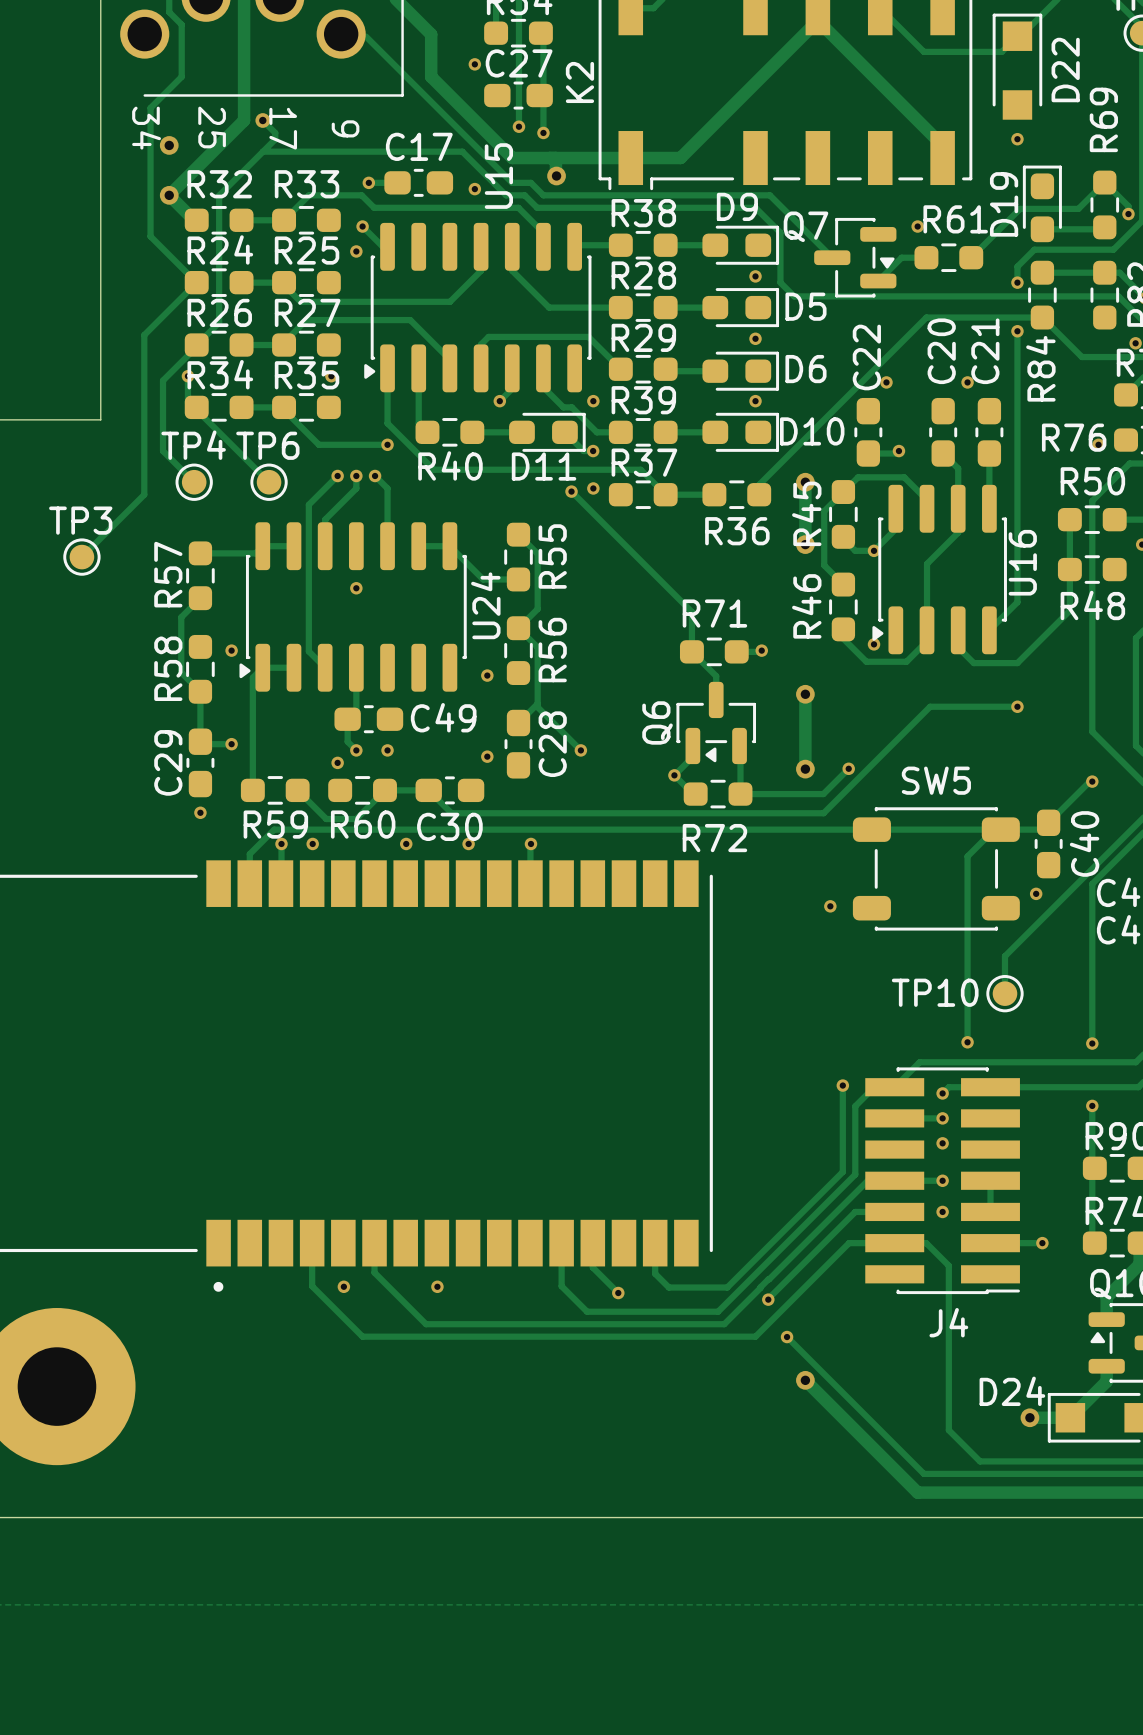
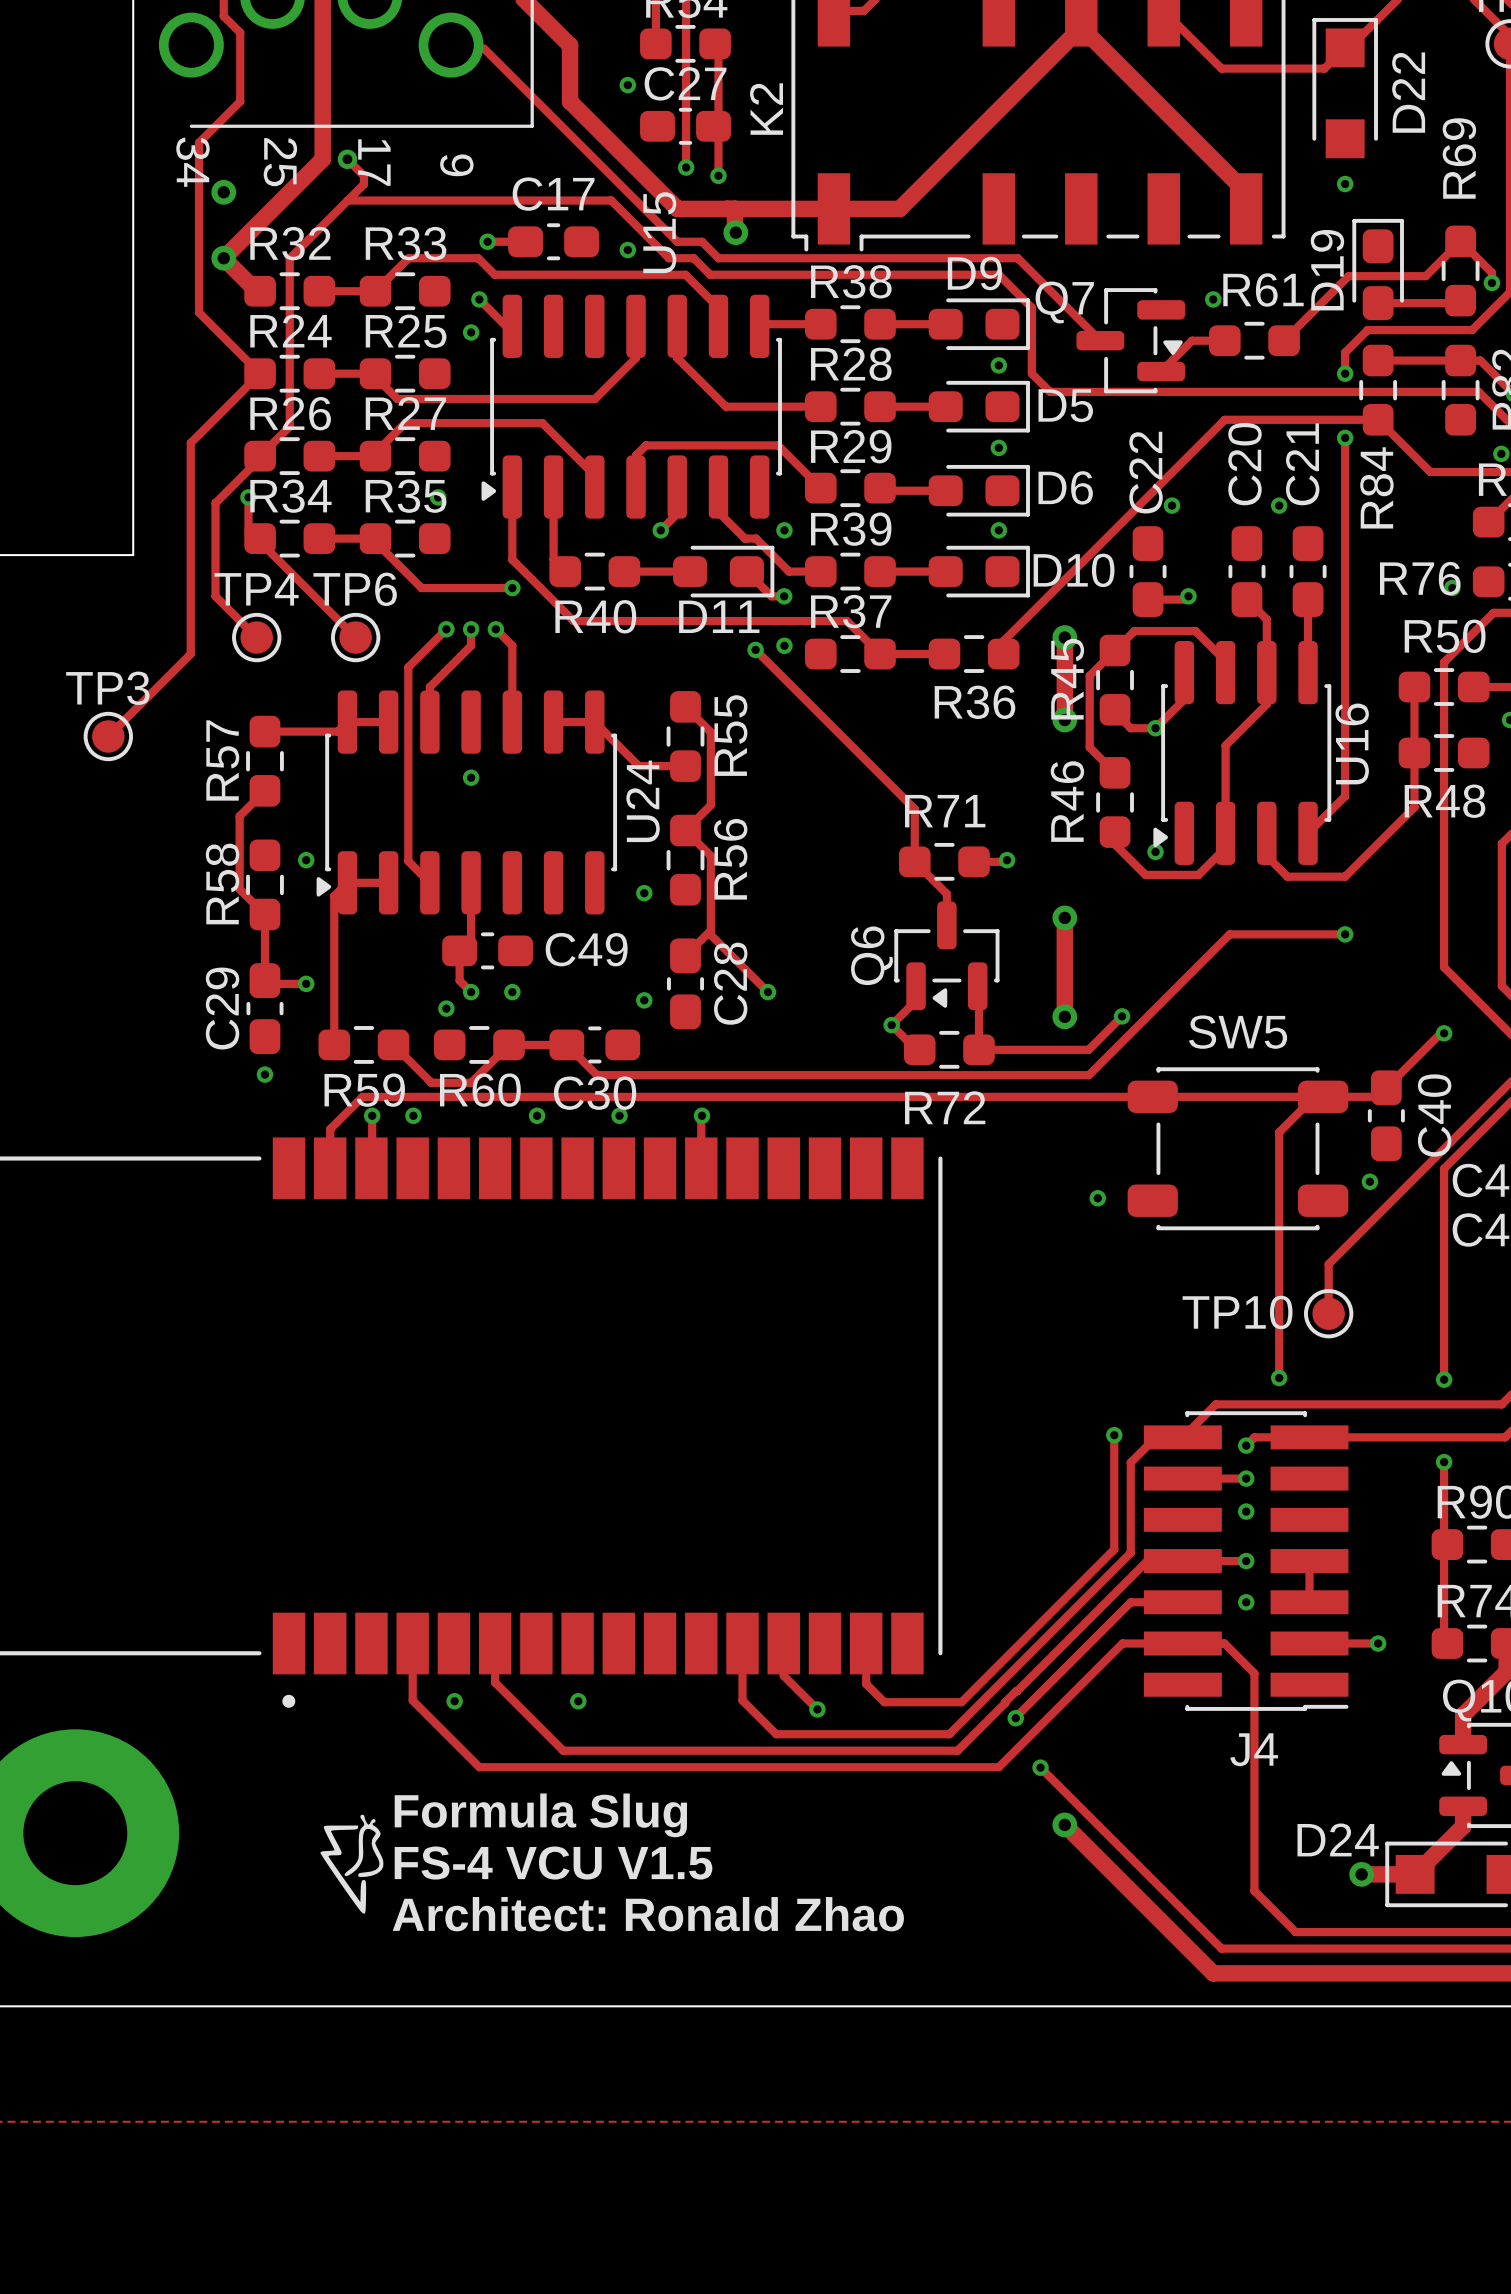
drawing: none -> [320, 1814, 384, 1914]
text: none -> Formula Slug (540, 1815)
text: none -> FS-4 VCU V1.5 (553, 1863)
text: none -> Architect: Ronald Zhao (648, 1914)

